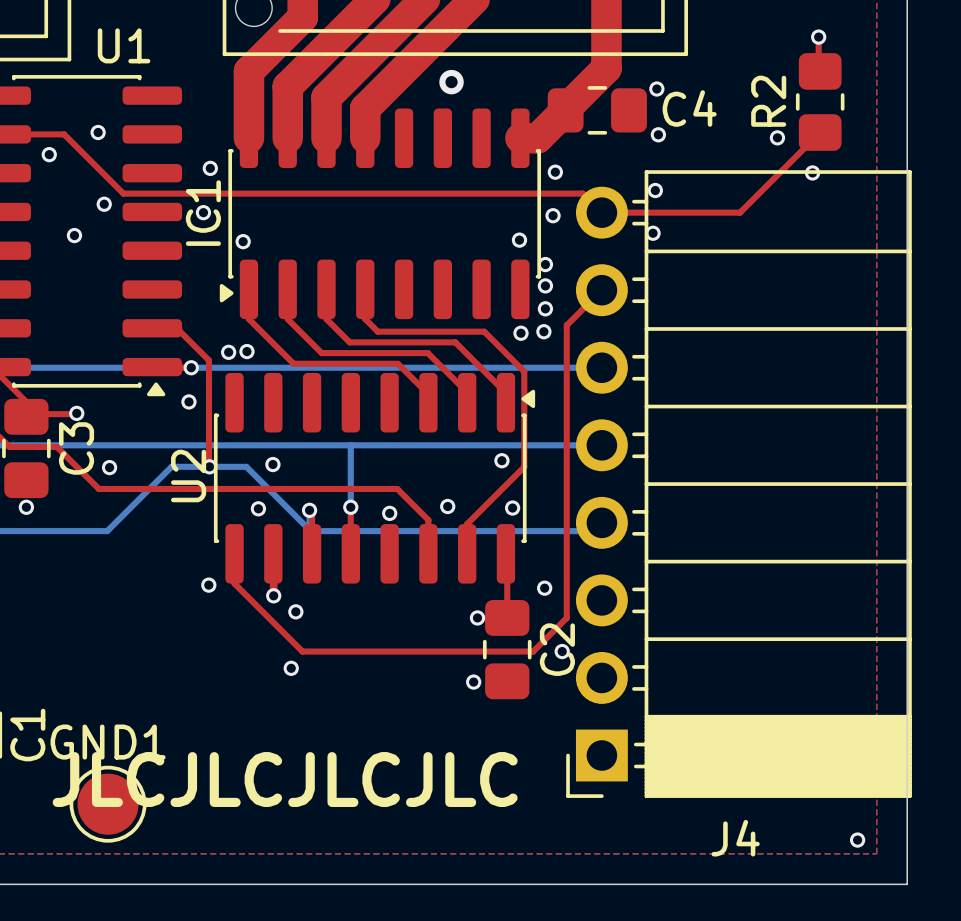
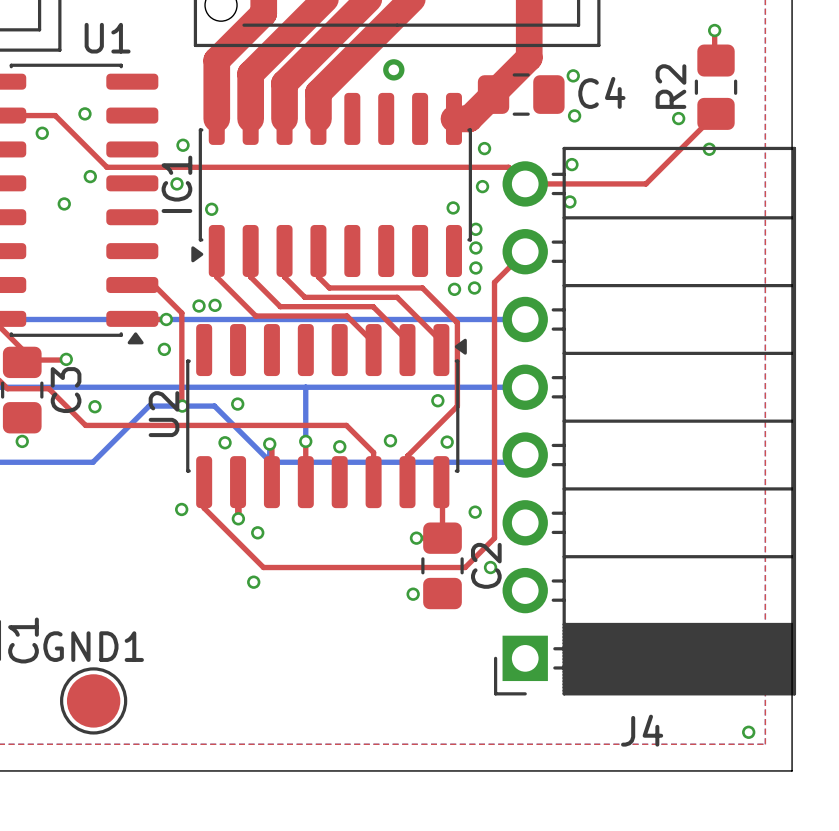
text: JLCJLCJLCJLC (285, 779) -> none

